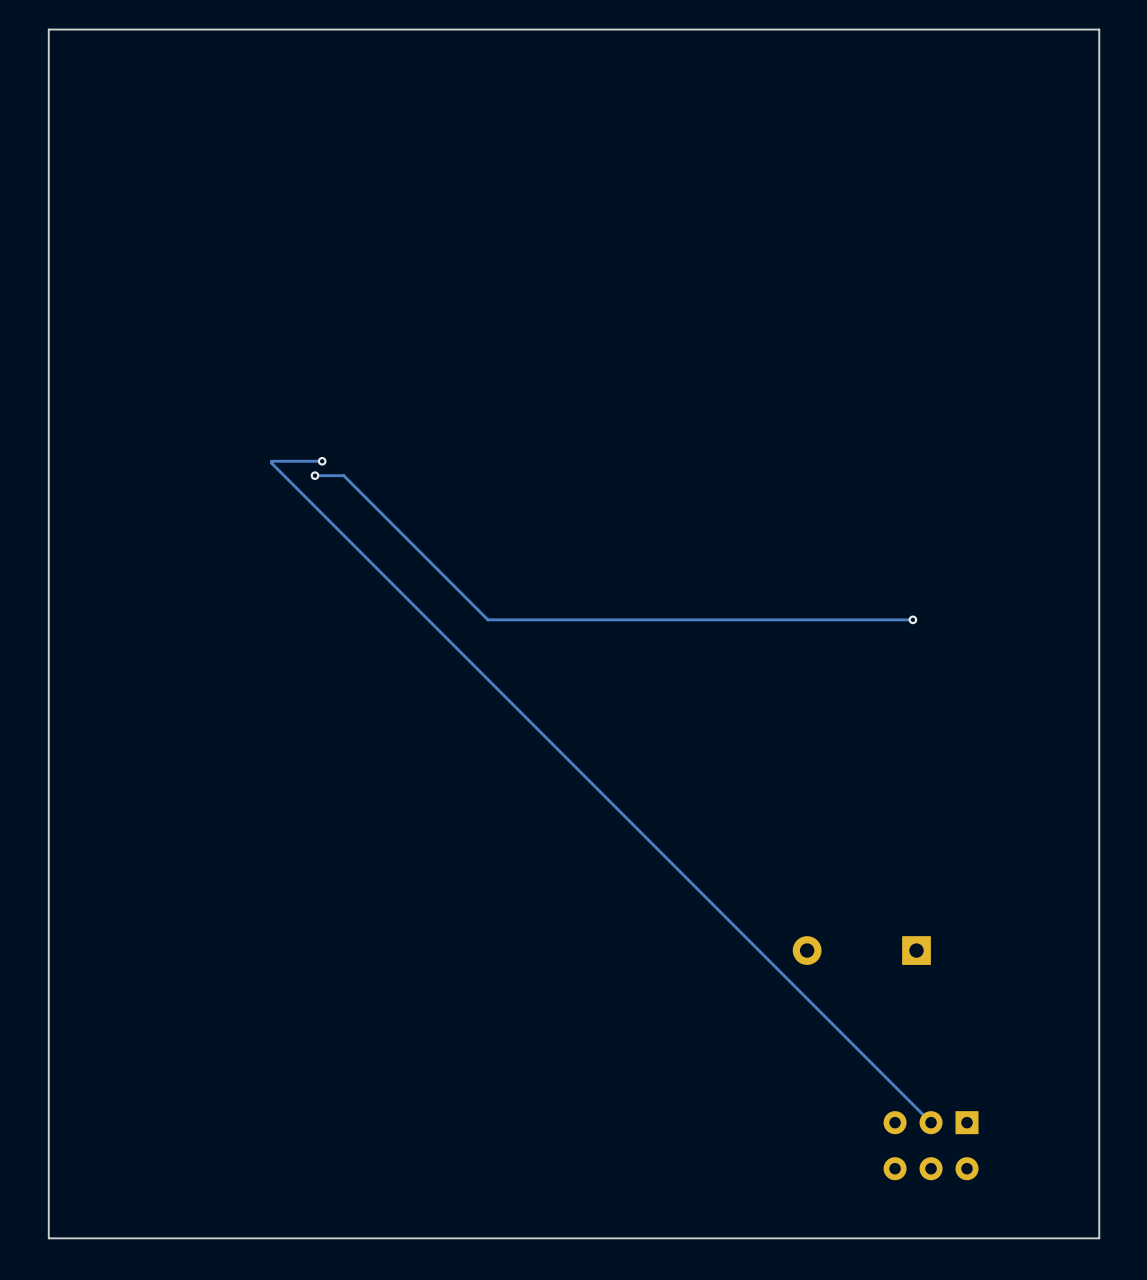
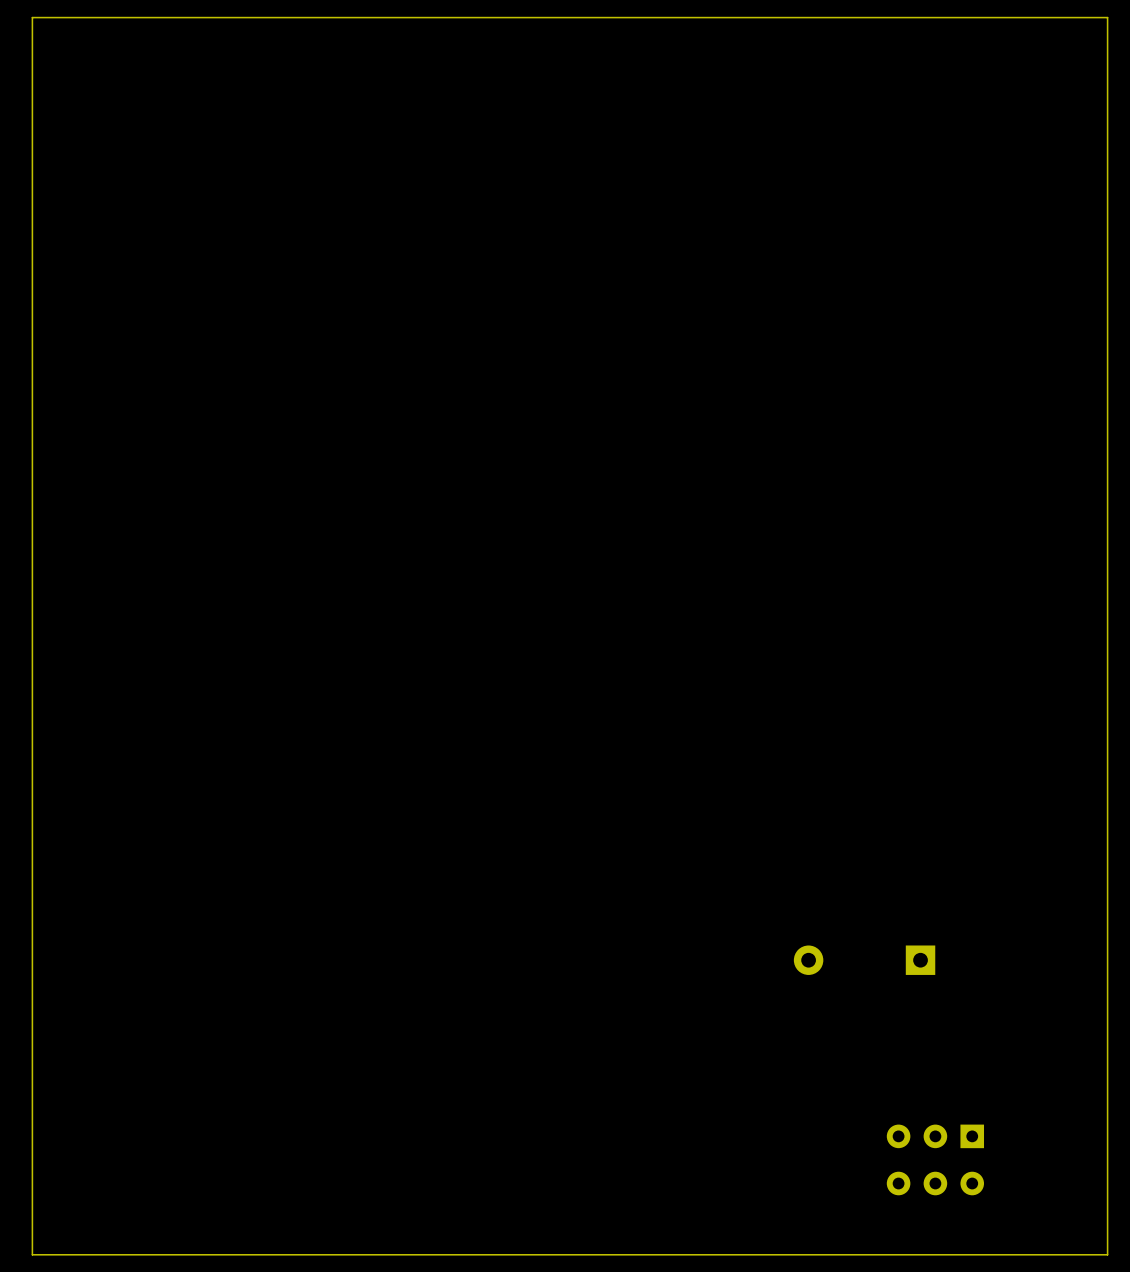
track: (322, 461) (271, 461) (271, 463) (931, 1122) -> none
via: (322, 461) -> none
track: (314, 475) (343, 475) (487, 619) (912, 619) -> none
via: (314, 475) -> none
via: (912, 619) -> none

